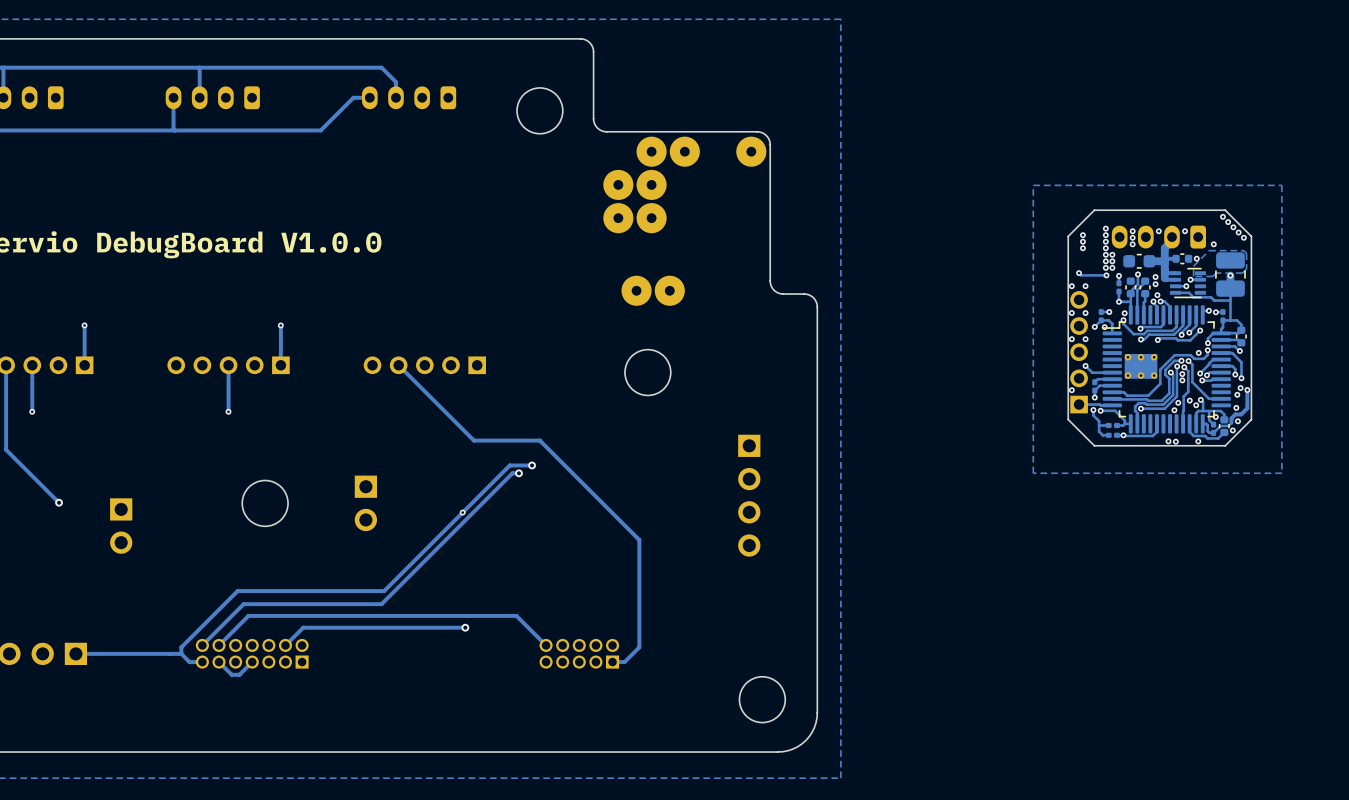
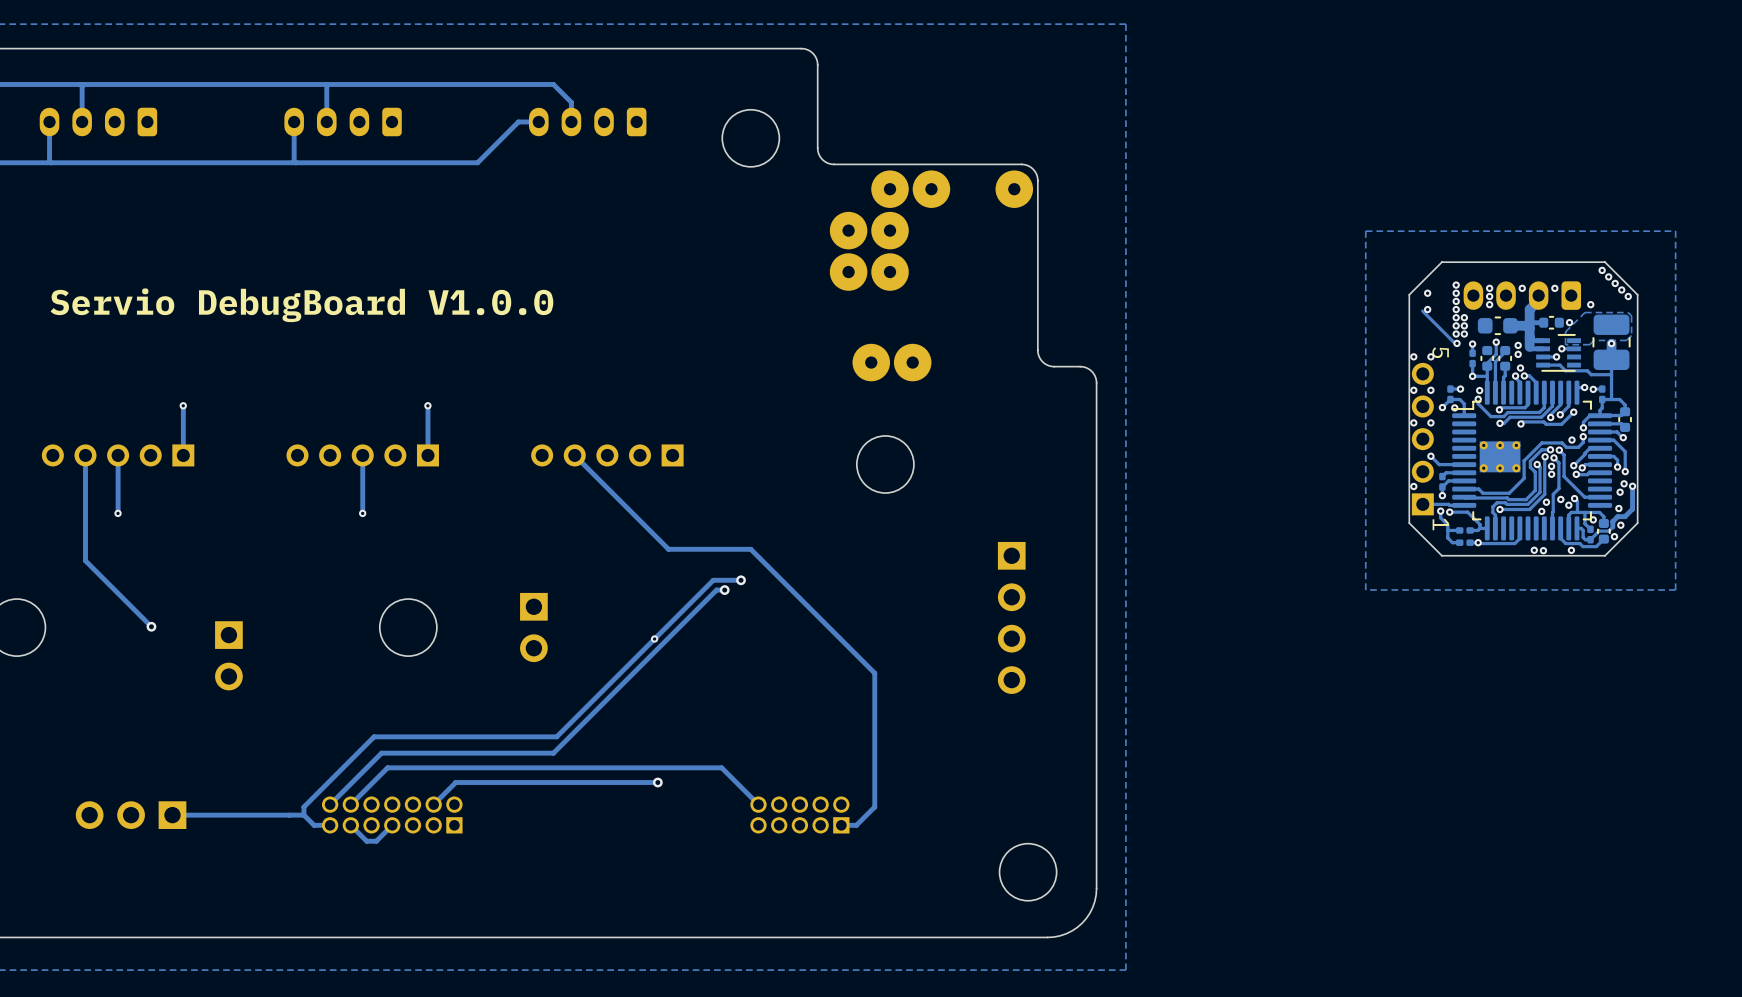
via: (1082, 241) -> none
track: none -> (1422, 311) (1454, 343)
track: (1079, 273) (1081, 275) (1106, 275) -> none
via: (1079, 273) -> none
text: none -> 5 (1440, 352)
text: none -> 1 (1440, 524)

